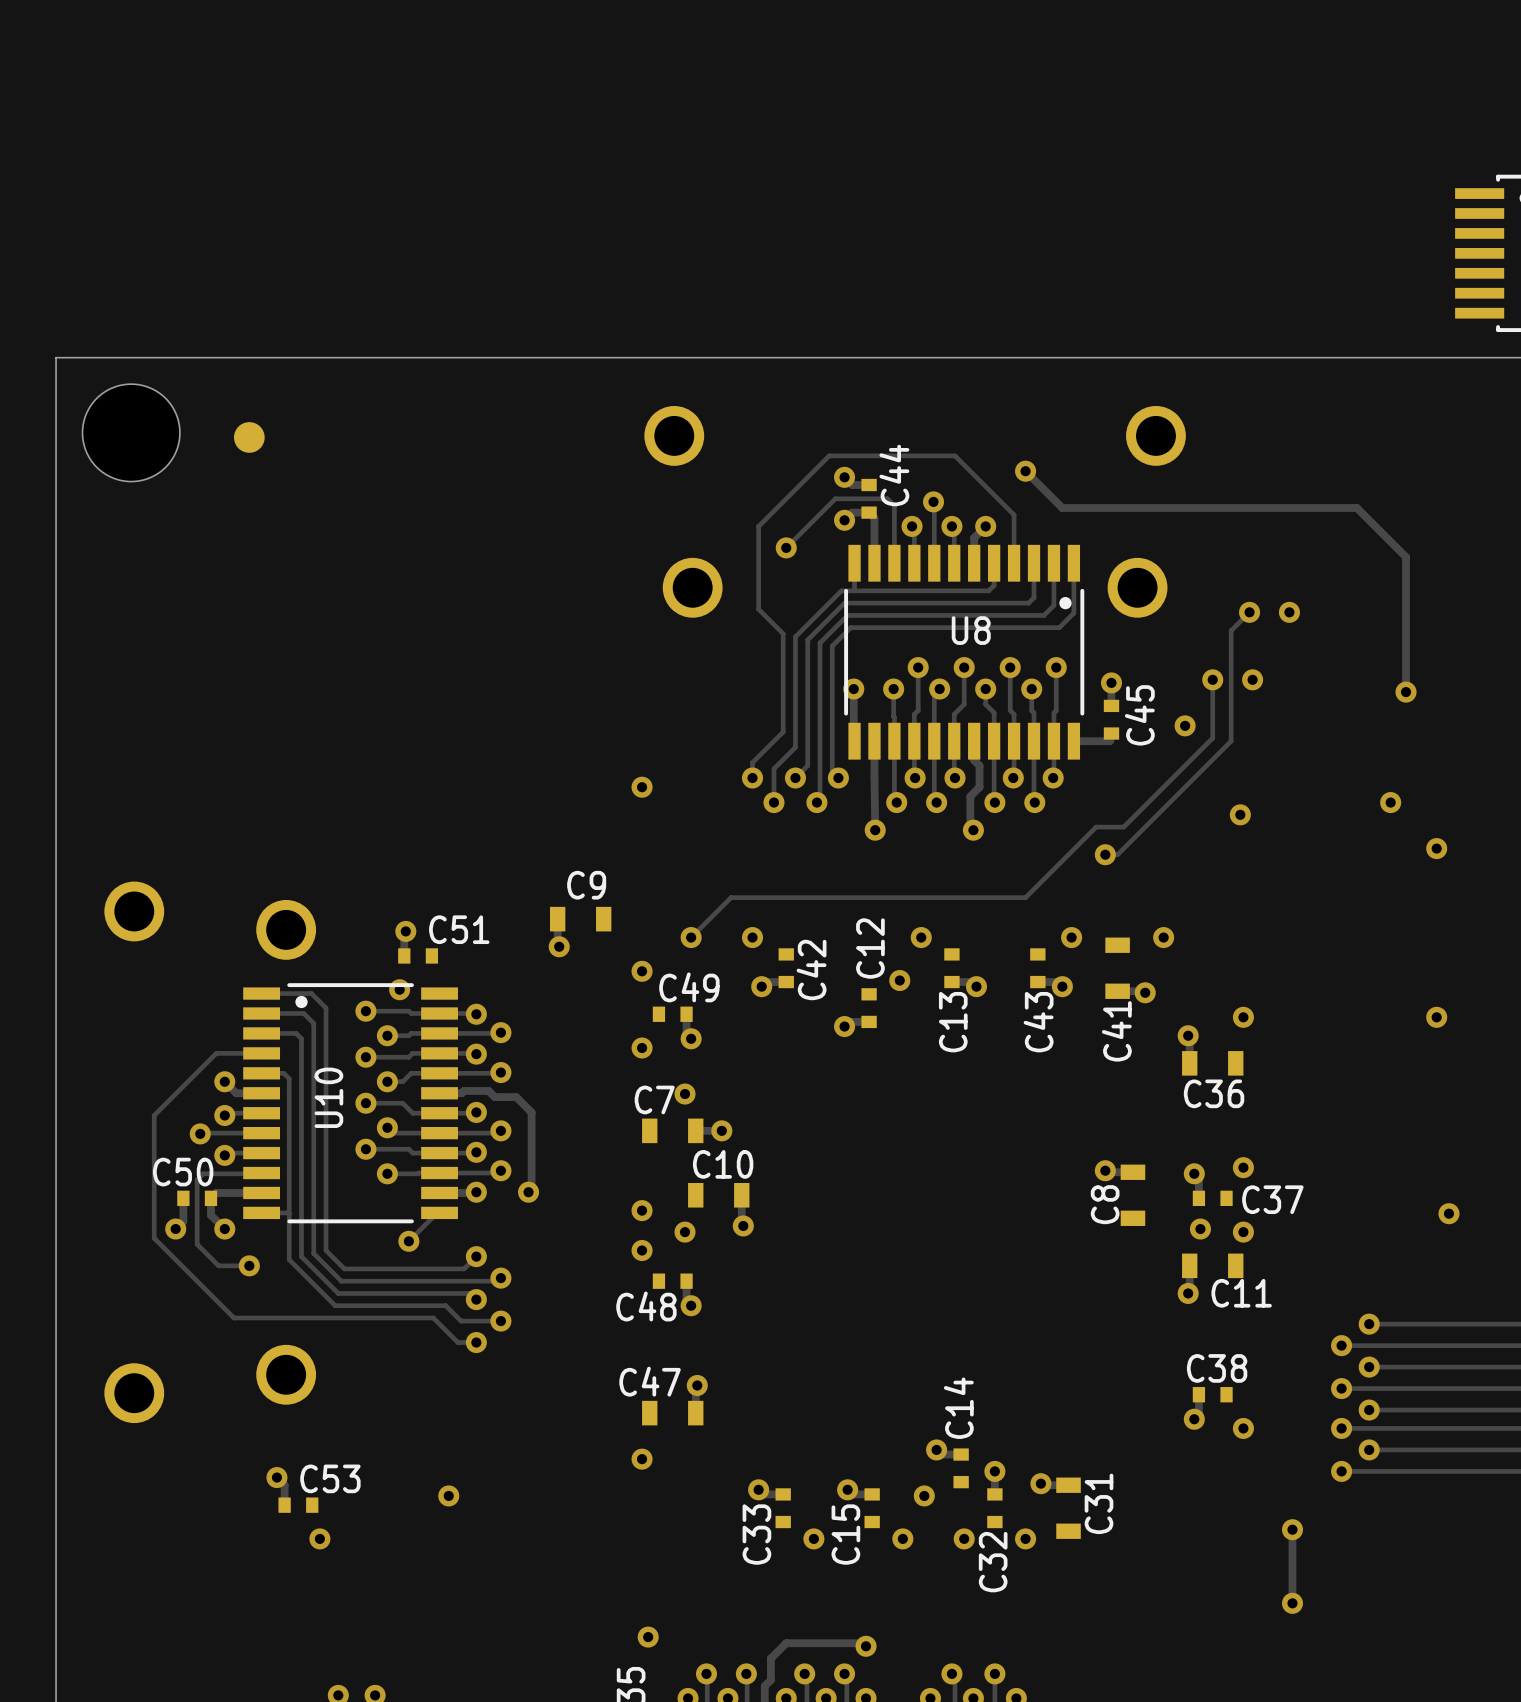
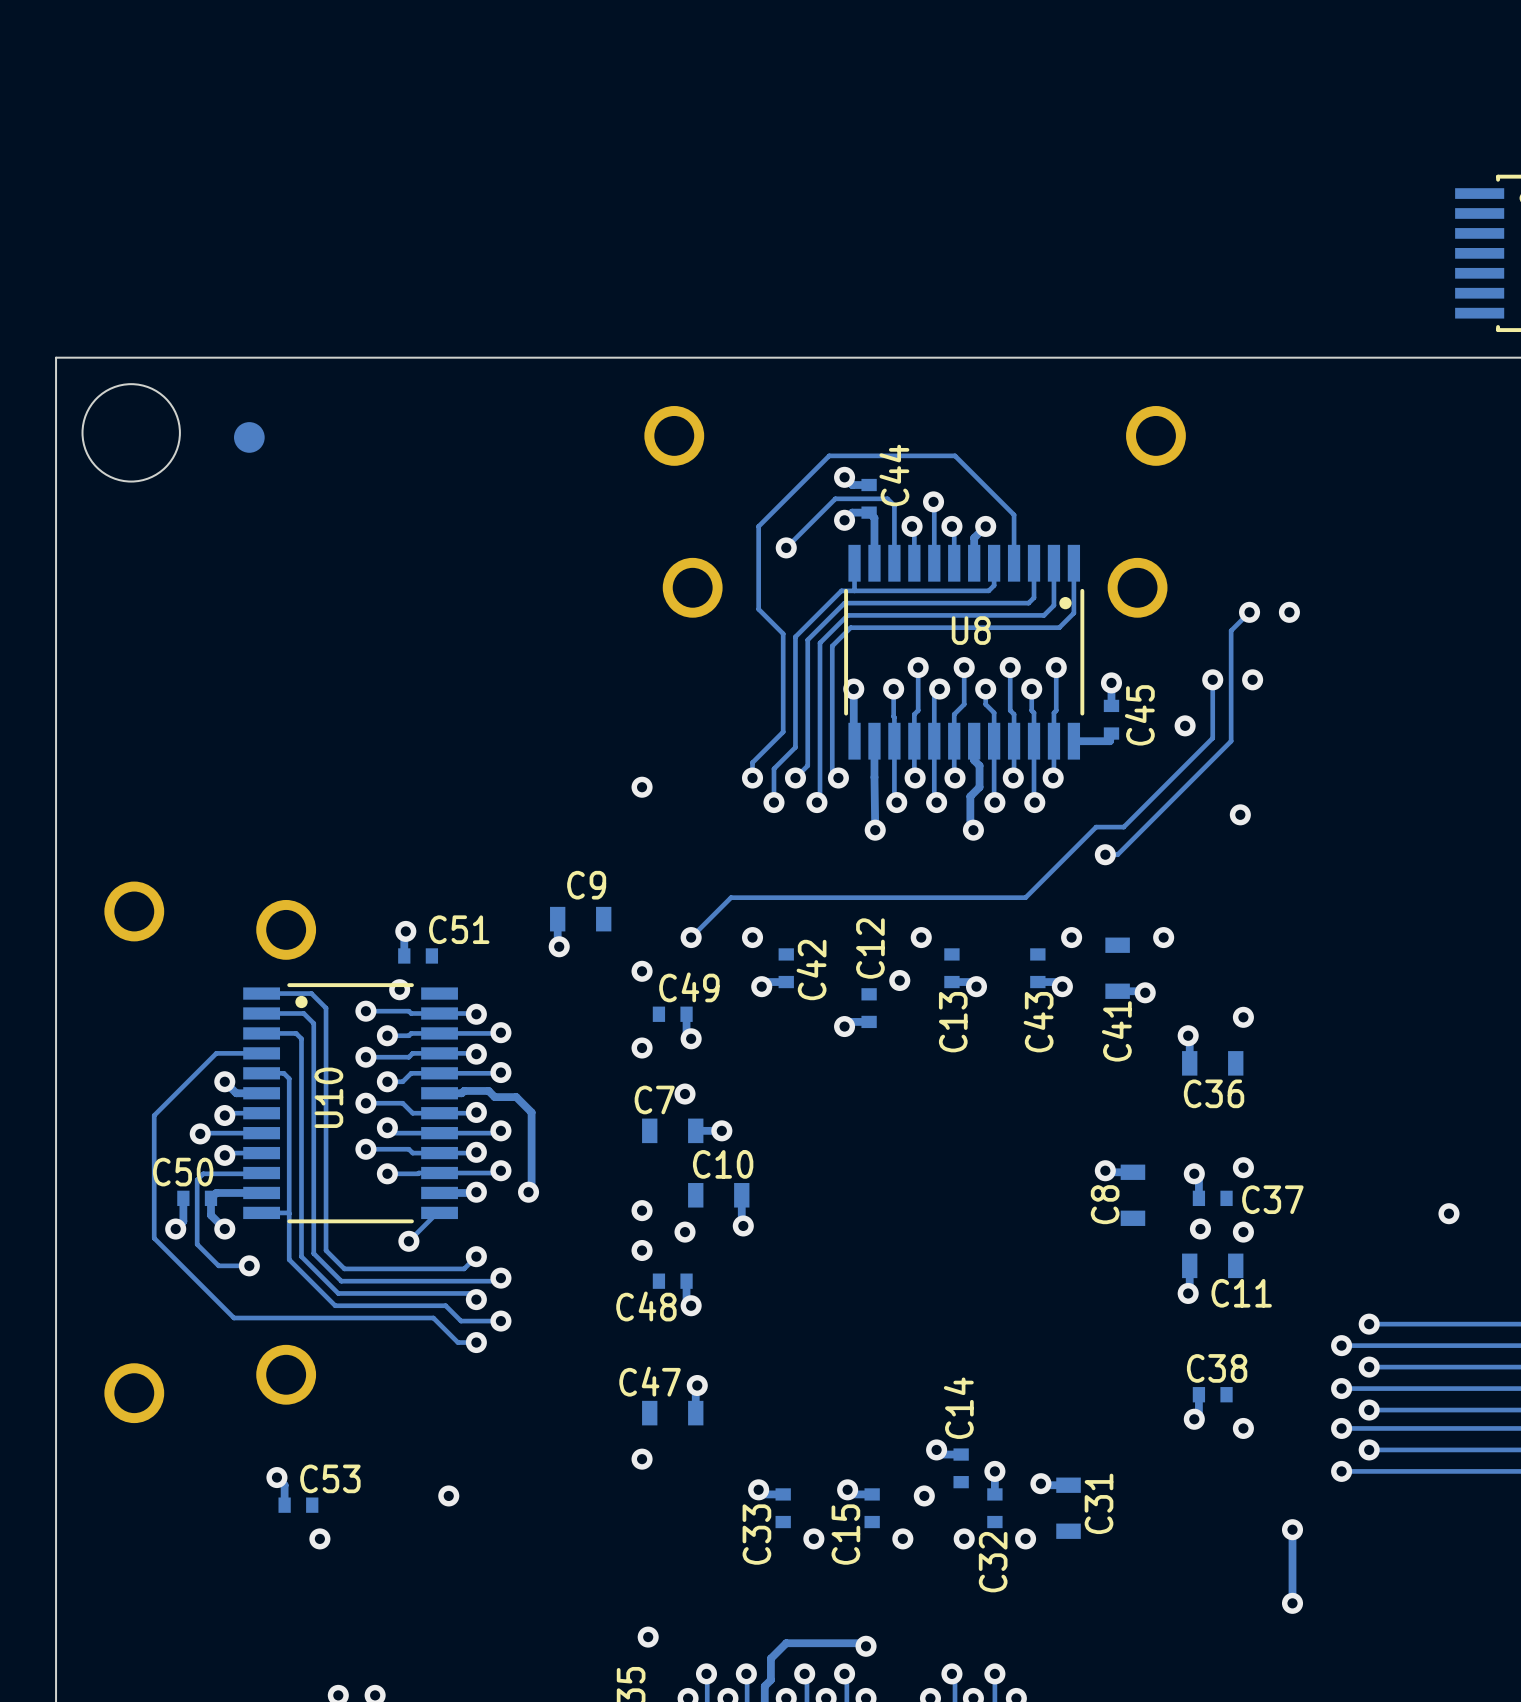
track: (1025, 471) (1062, 508) (1356, 508) (1406, 557) (1406, 692) -> none
via: (1025, 471) -> none
via: (1406, 692) -> none
via: (1390, 802) -> none
via: (1436, 848) -> none
via: (1436, 1017) -> none

